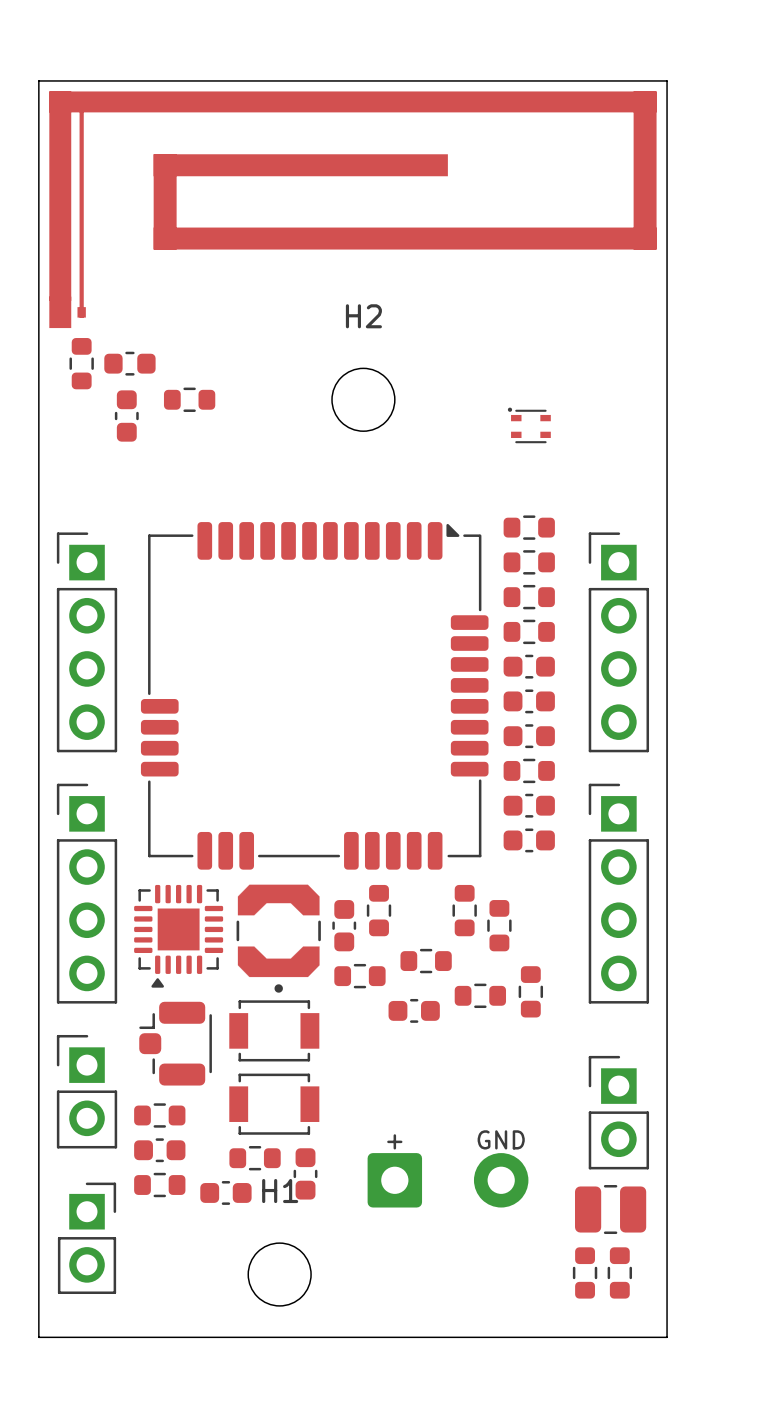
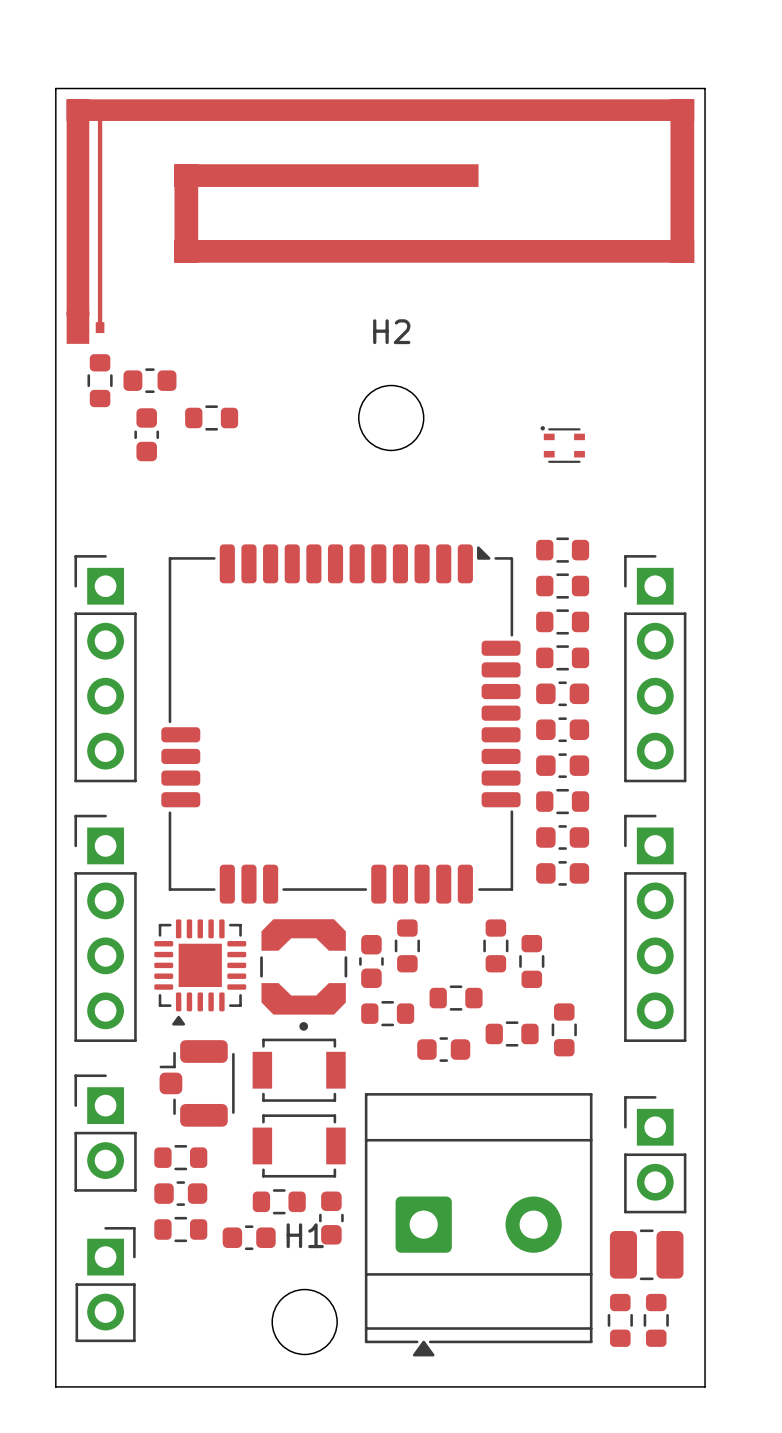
part footprint: [367, 1153, 529, 1208] -> [364, 1093, 593, 1357]

